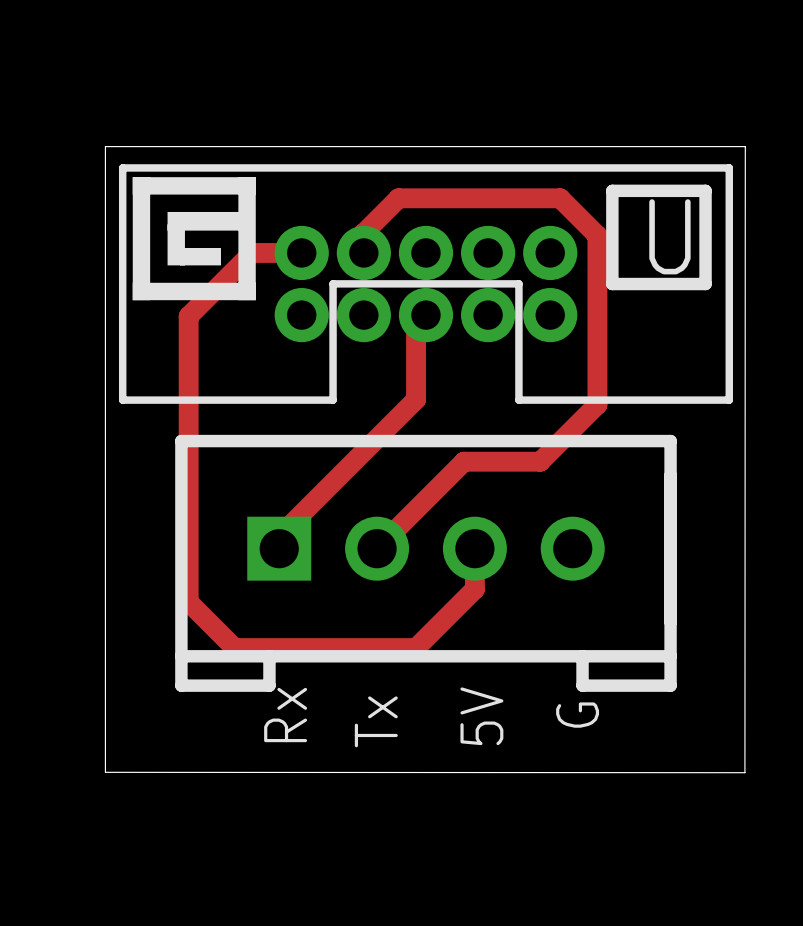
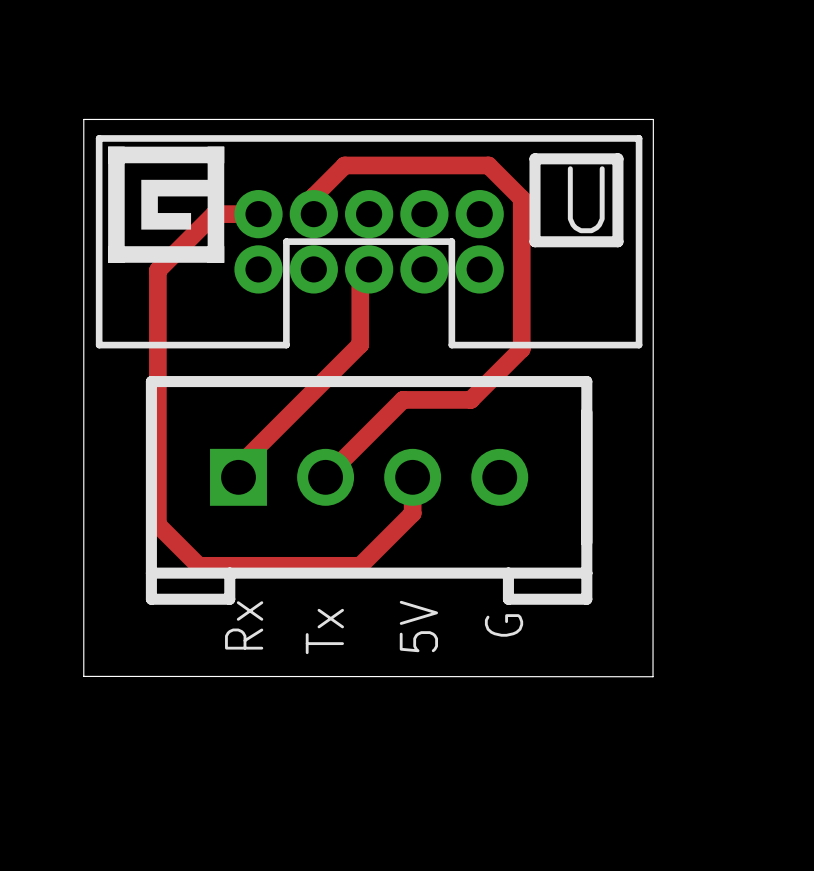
drawing: [132, 177, 256, 301] -> none
drawing: none -> [108, 146, 225, 263]

